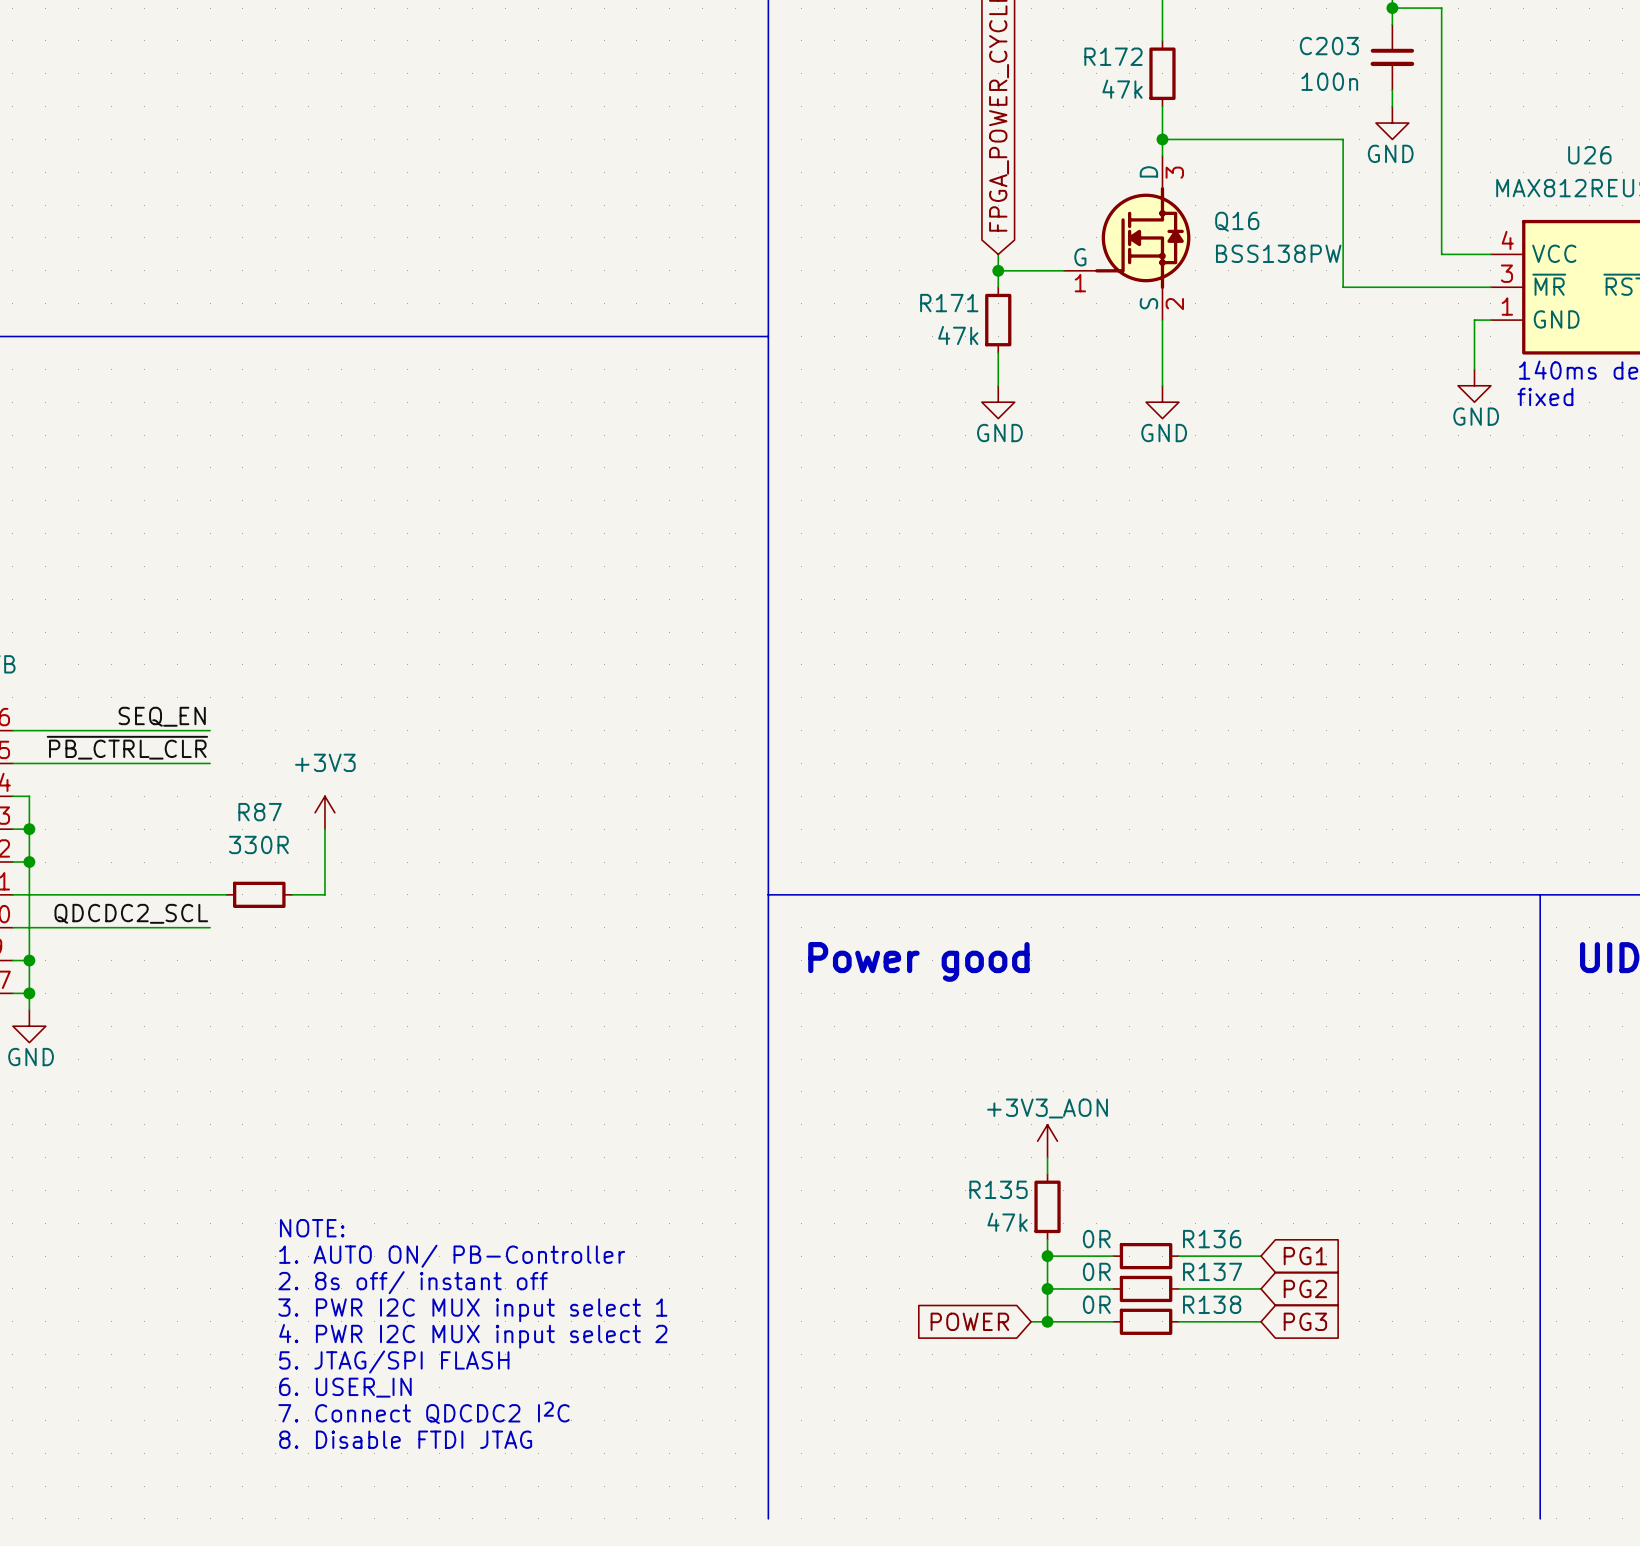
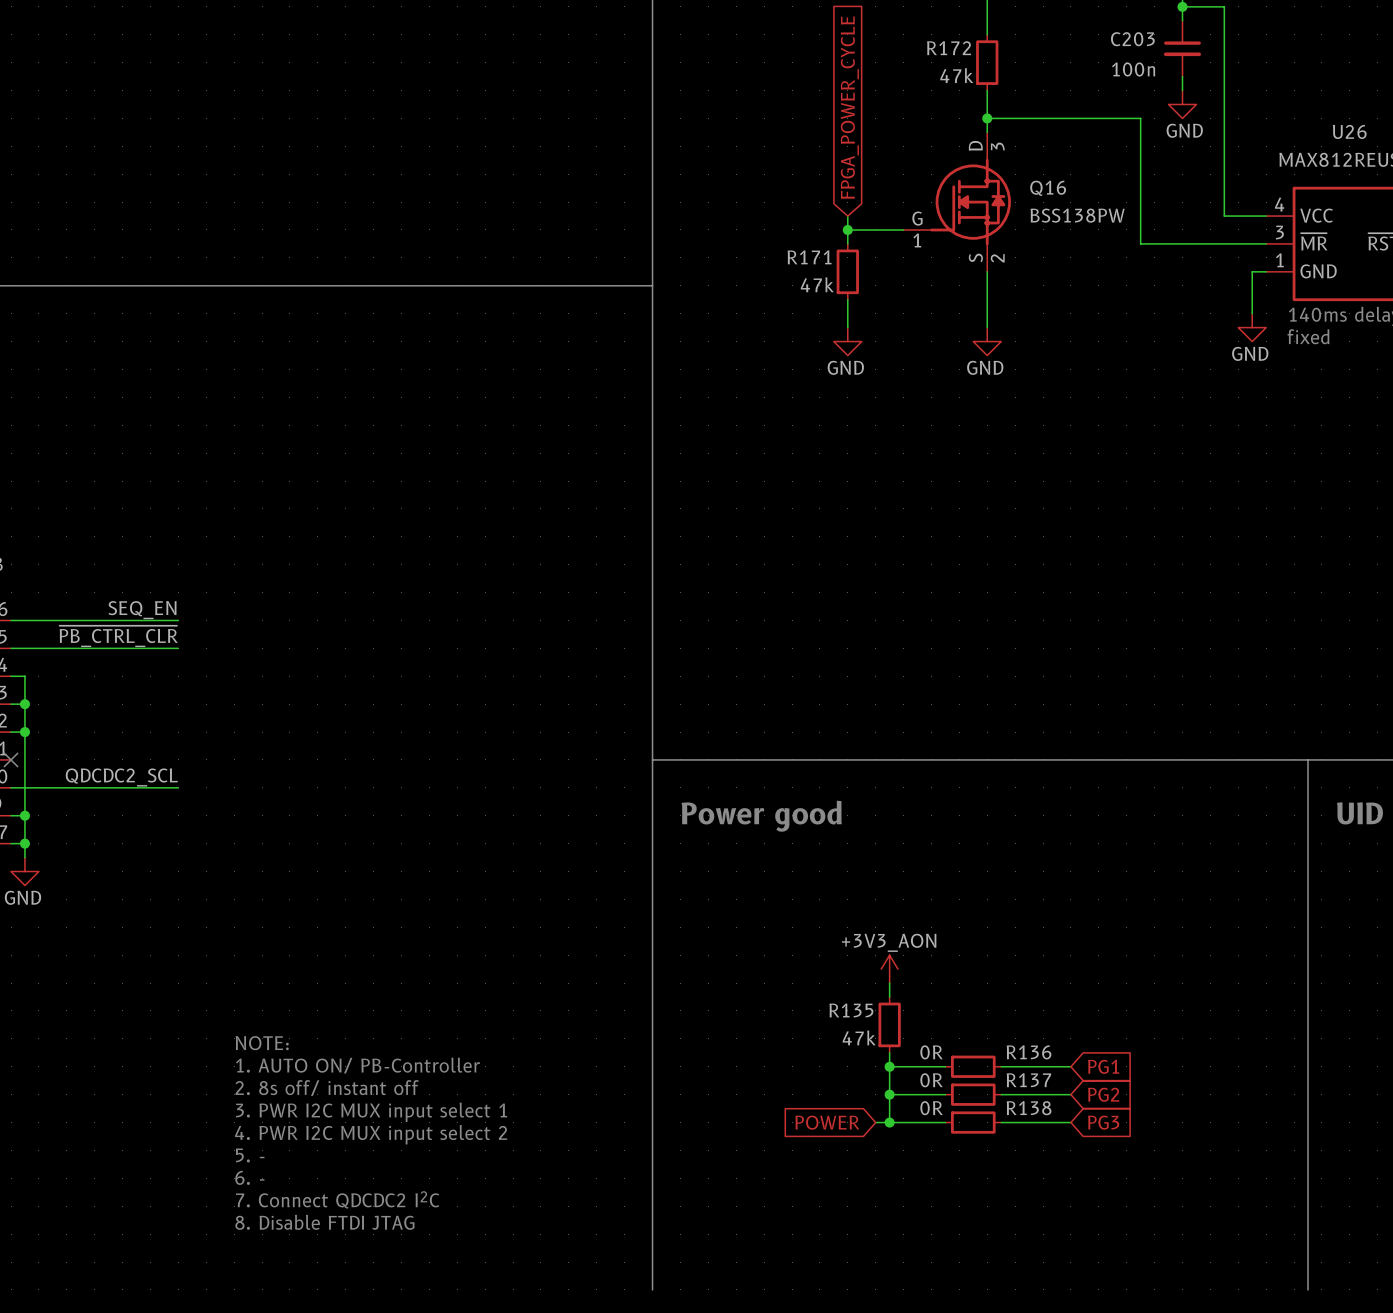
power symbol: +3V3 (324, 812) -> none
wire: (324, 829) (324, 894) (292, 894) -> none
wire: (12, 894) (226, 894) -> none
no-connect mark: none -> (11, 759)
R87: (259, 894) -> none
text: 5. JTAG/SPI FLASH (394, 1361) -> 5. - (250, 1155)
text: 6. USER_IN (345, 1387) -> 6. - (249, 1177)

